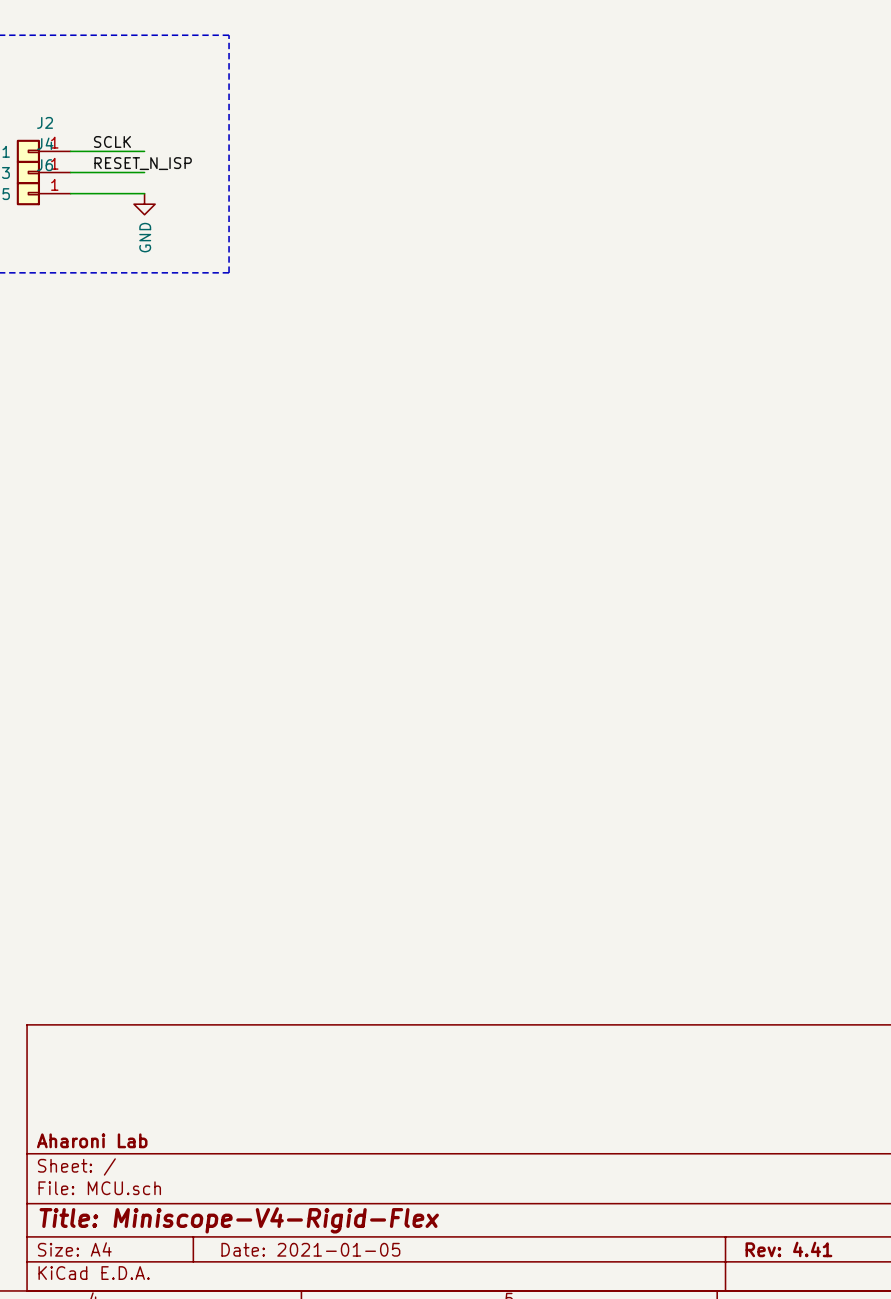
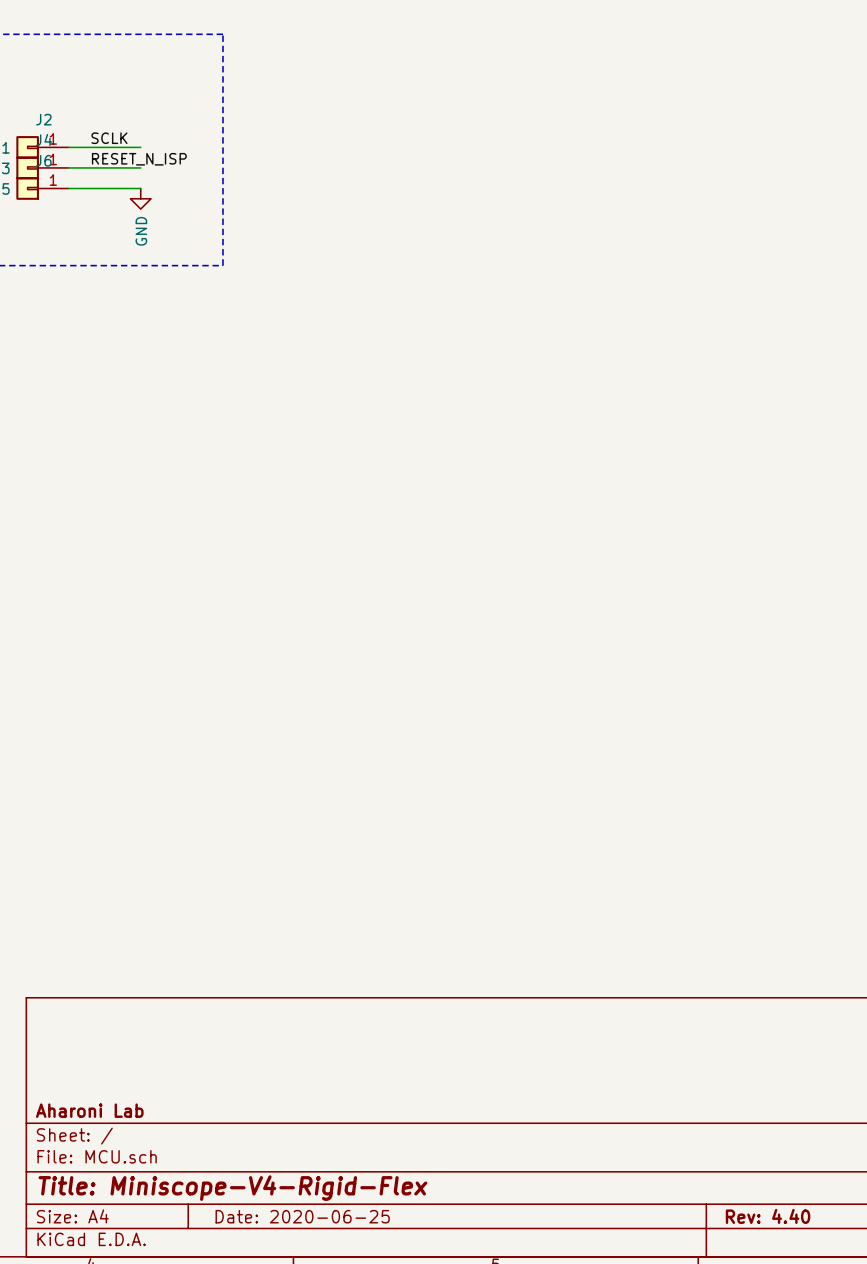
title block: Date: 2021-01-05 (310, 1249) -> Date: 2020-06-25 (302, 1216)
title block: Rev: 4.41 (788, 1249) -> Rev: 4.40 (768, 1216)

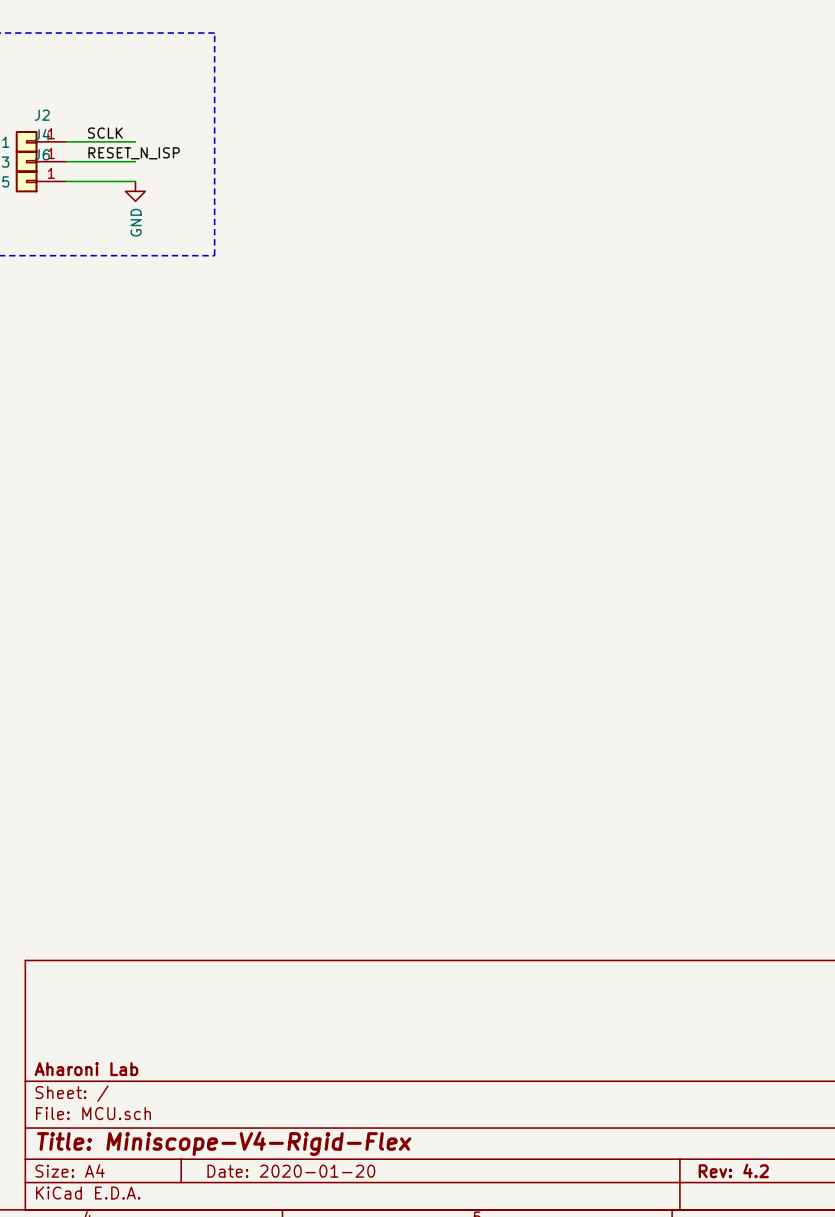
title block: Date: 2020-06-25 (302, 1216) -> Date: 2020-01-20 (291, 1171)
title block: Rev: 4.40 (768, 1216) -> Rev: 4.2 (733, 1170)

